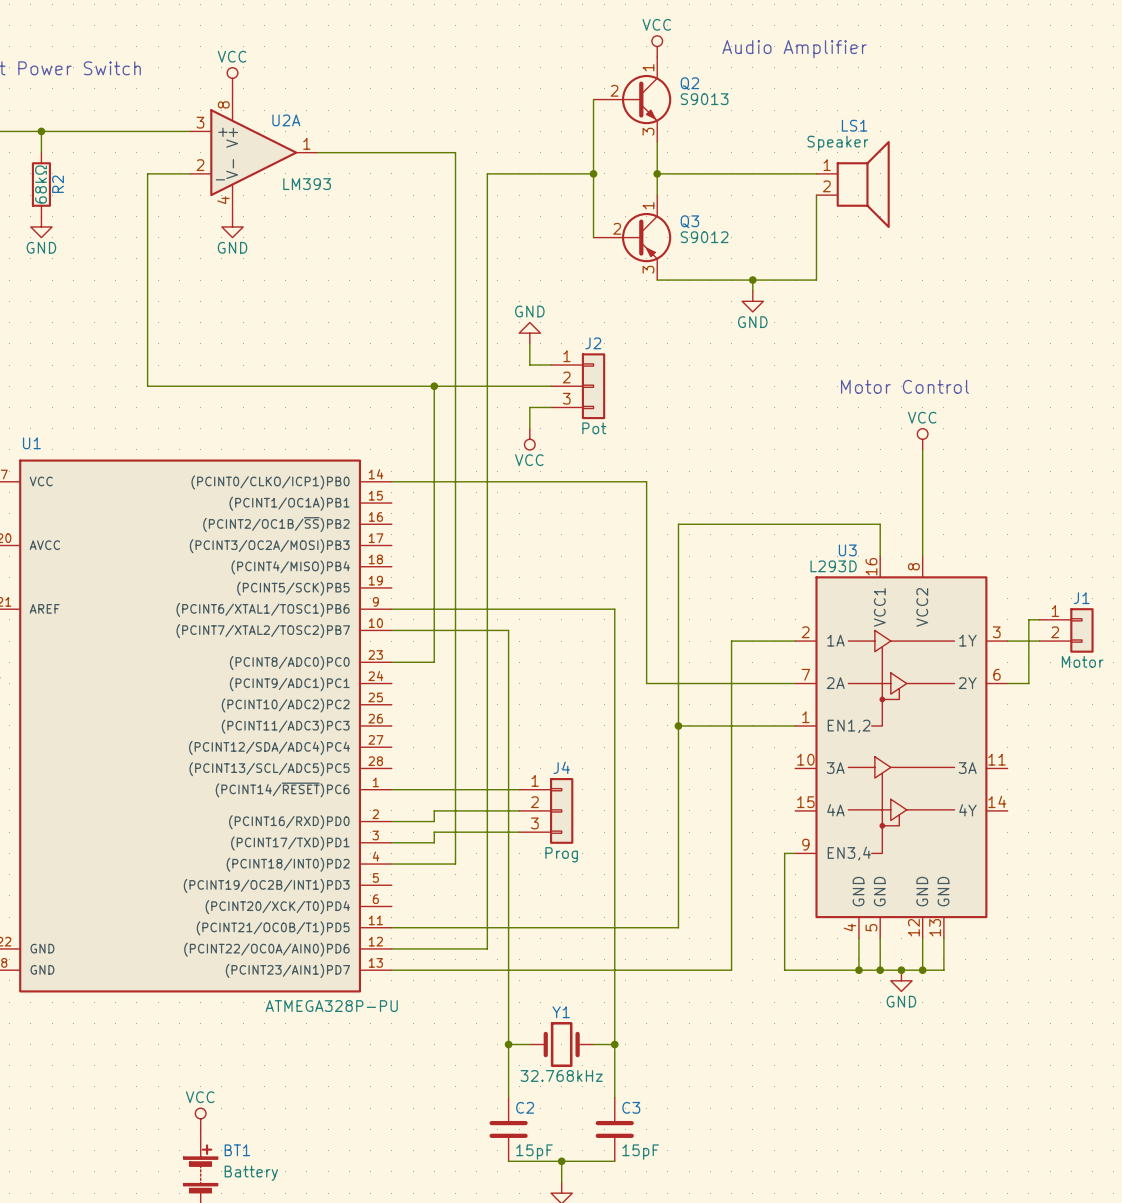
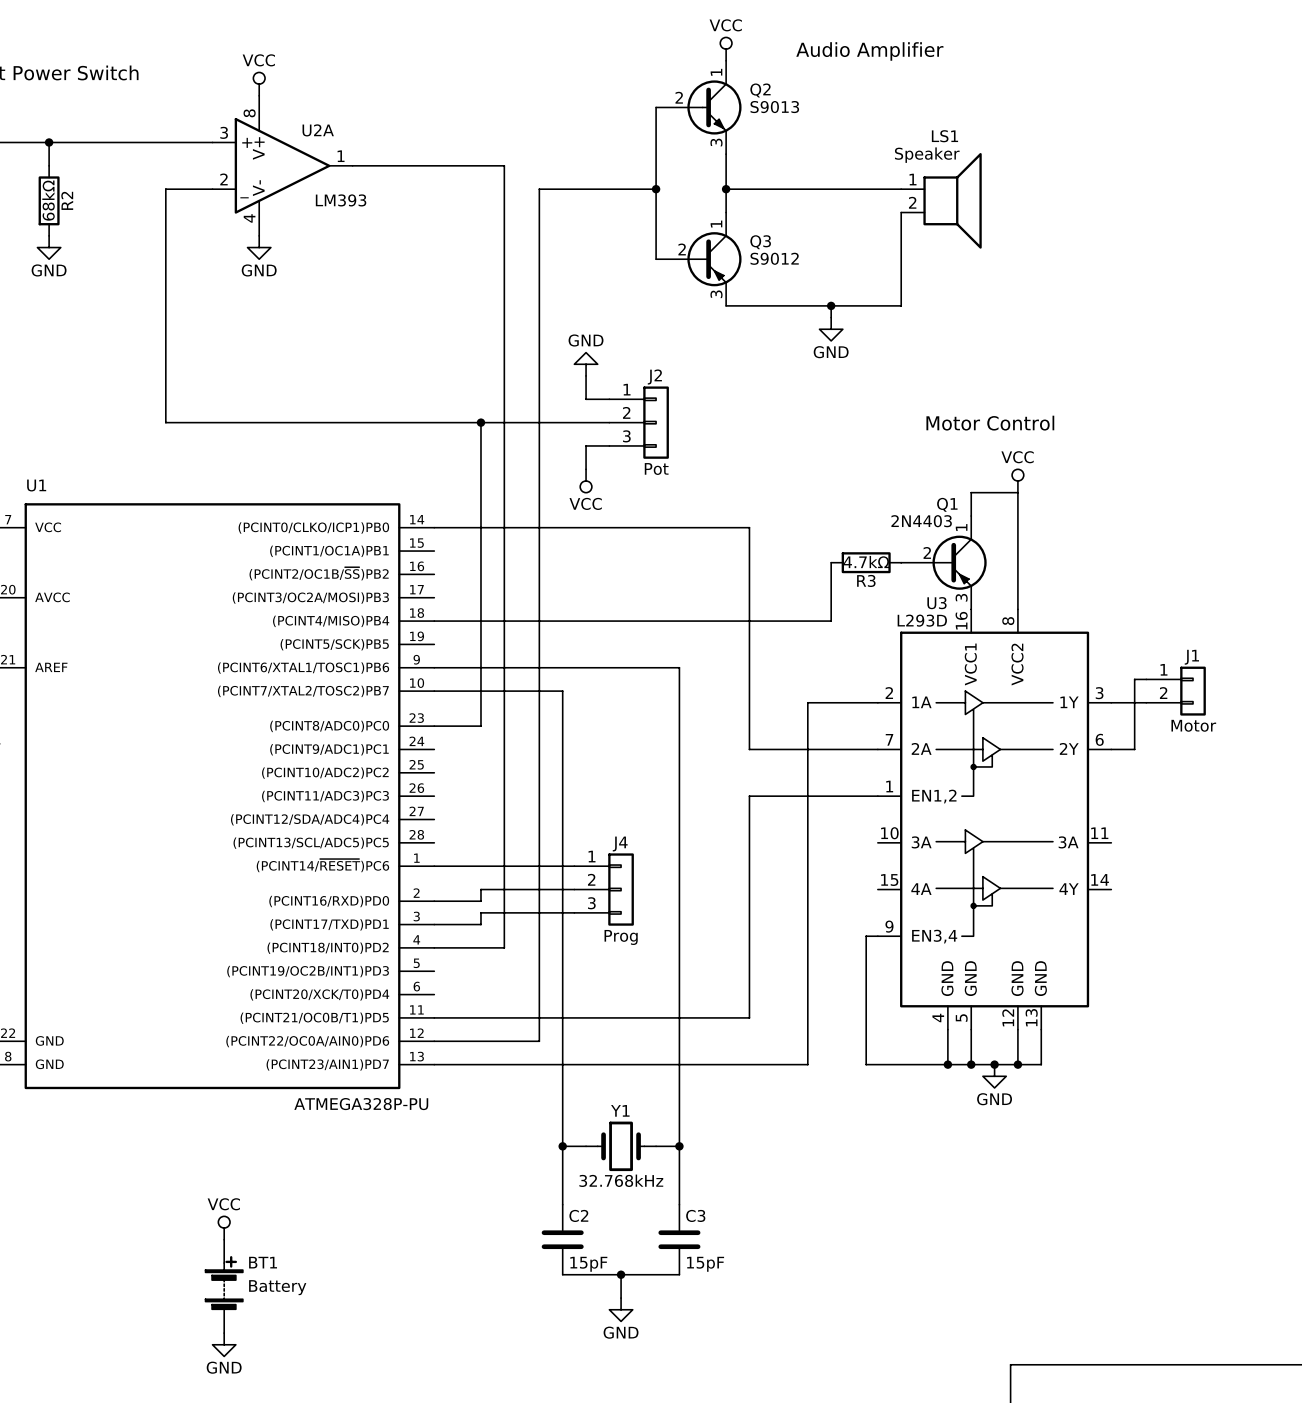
wire: none -> (1017, 492) (971, 492) (971, 516)
wire: (646, 481) (646, 683) (678, 683) (678, 725) -> (714, 527) (749, 527) (749, 574)
wire: none -> (831, 562) (831, 621) (434, 621)
R3: none -> 4.7kΩ (866, 562)
Q1: none -> 2N4403 (943, 562)
wire: (678, 524) (880, 524) (880, 556) -> none
junction: (678, 725) -> none

